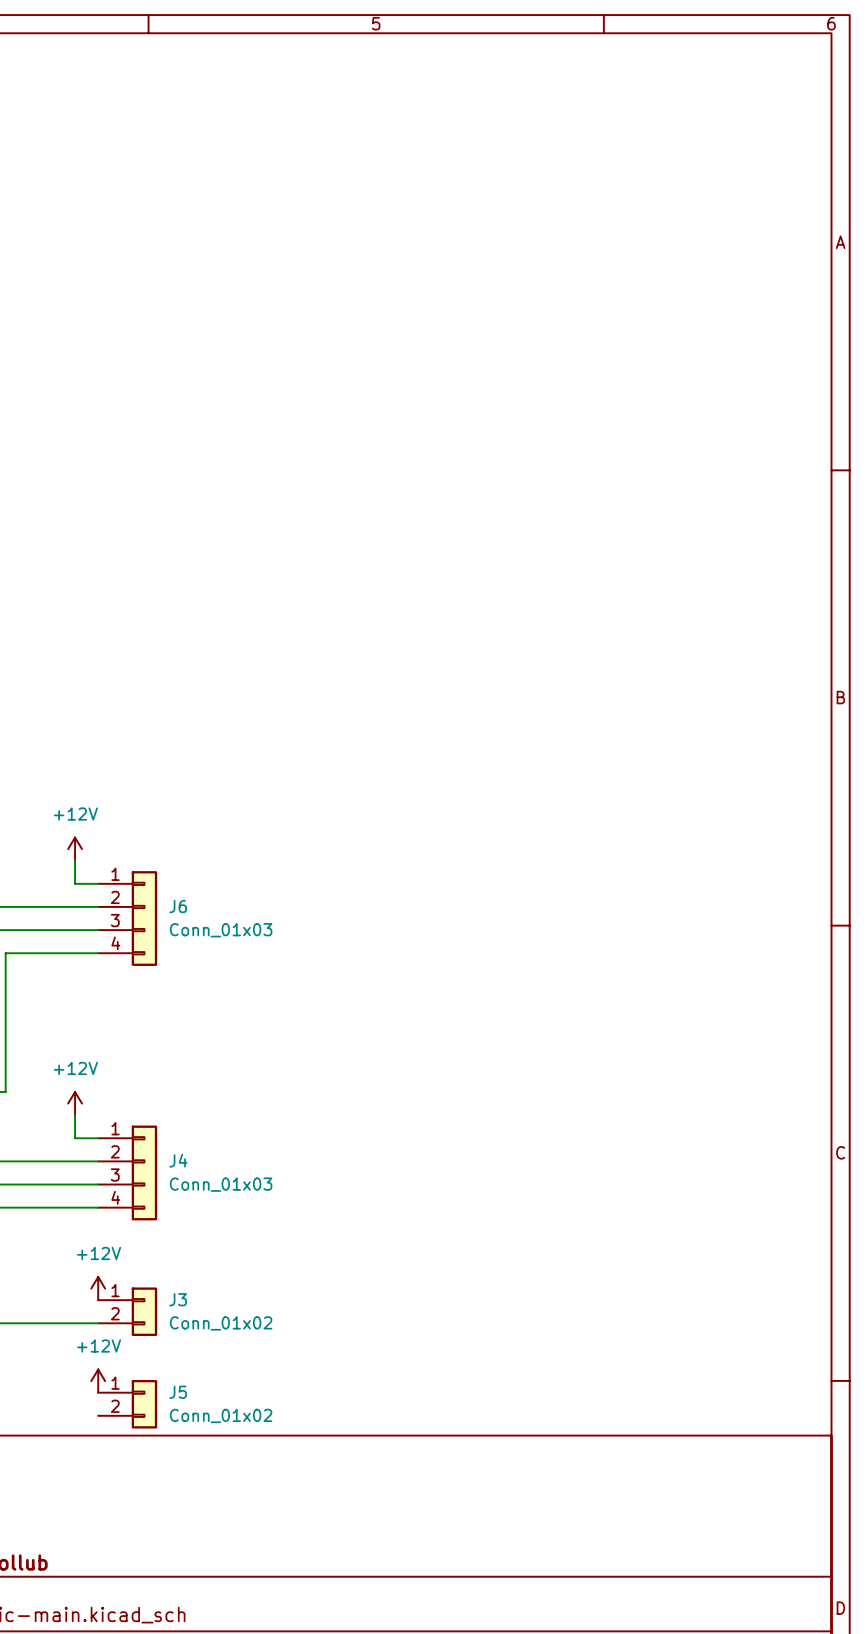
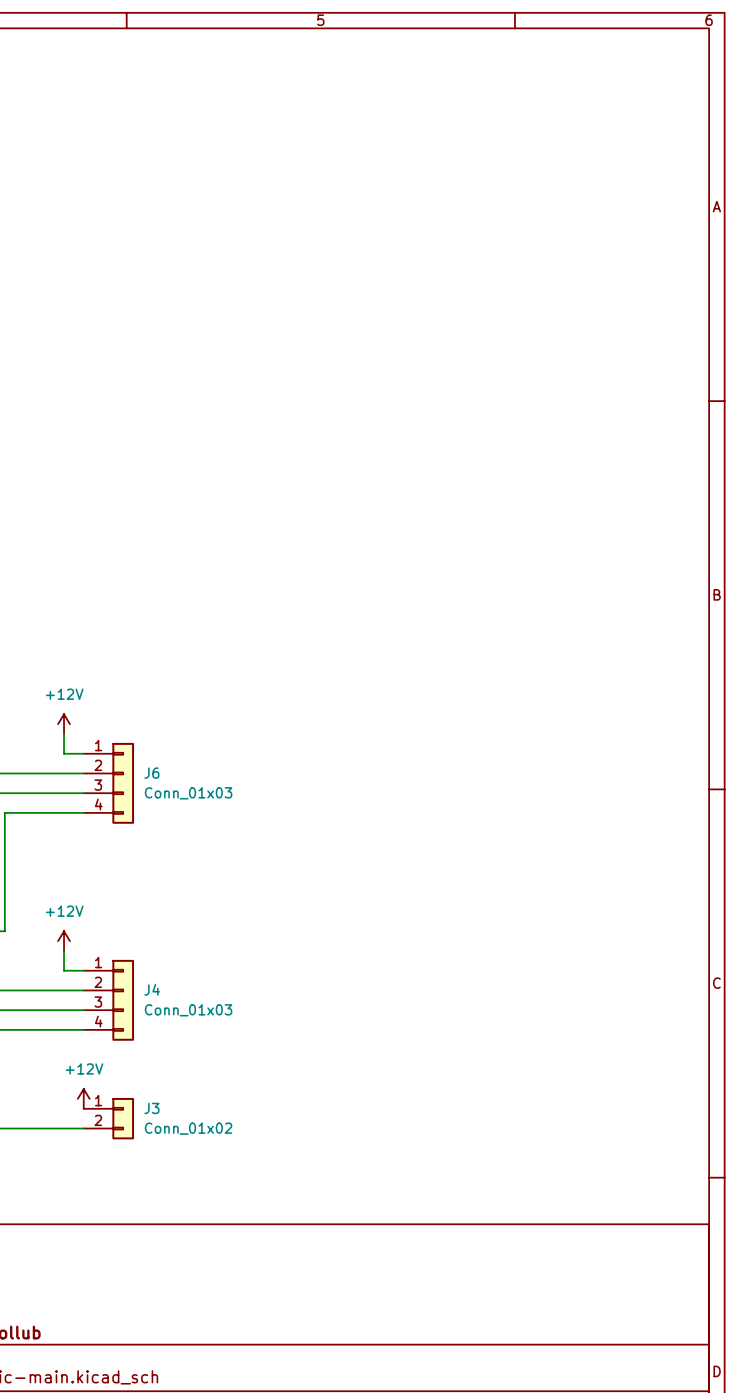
power symbol: +12V (98, 1381) -> none
J5: Conn_01x02 (127, 1404) -> none

